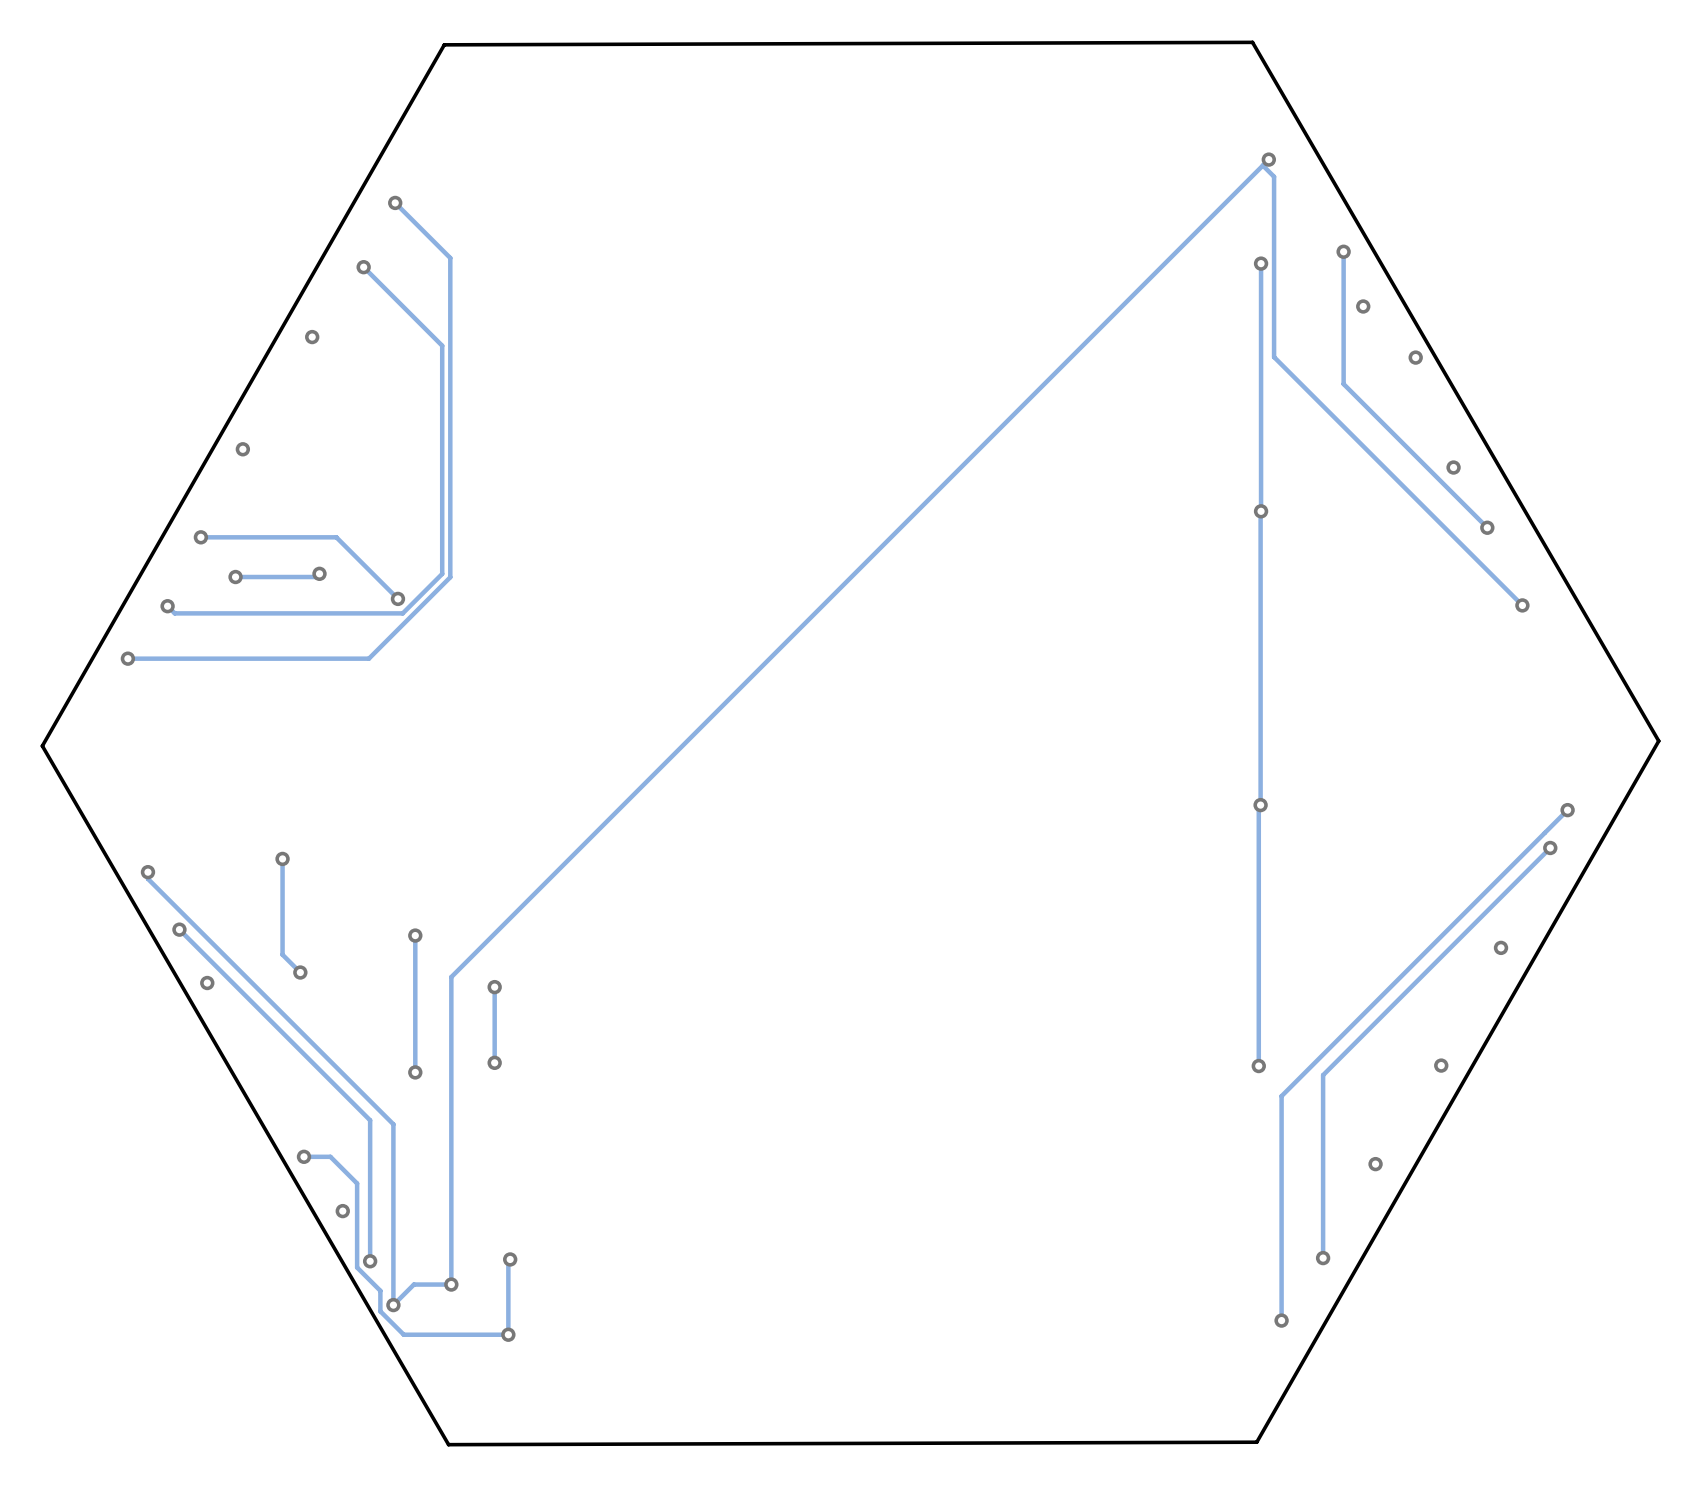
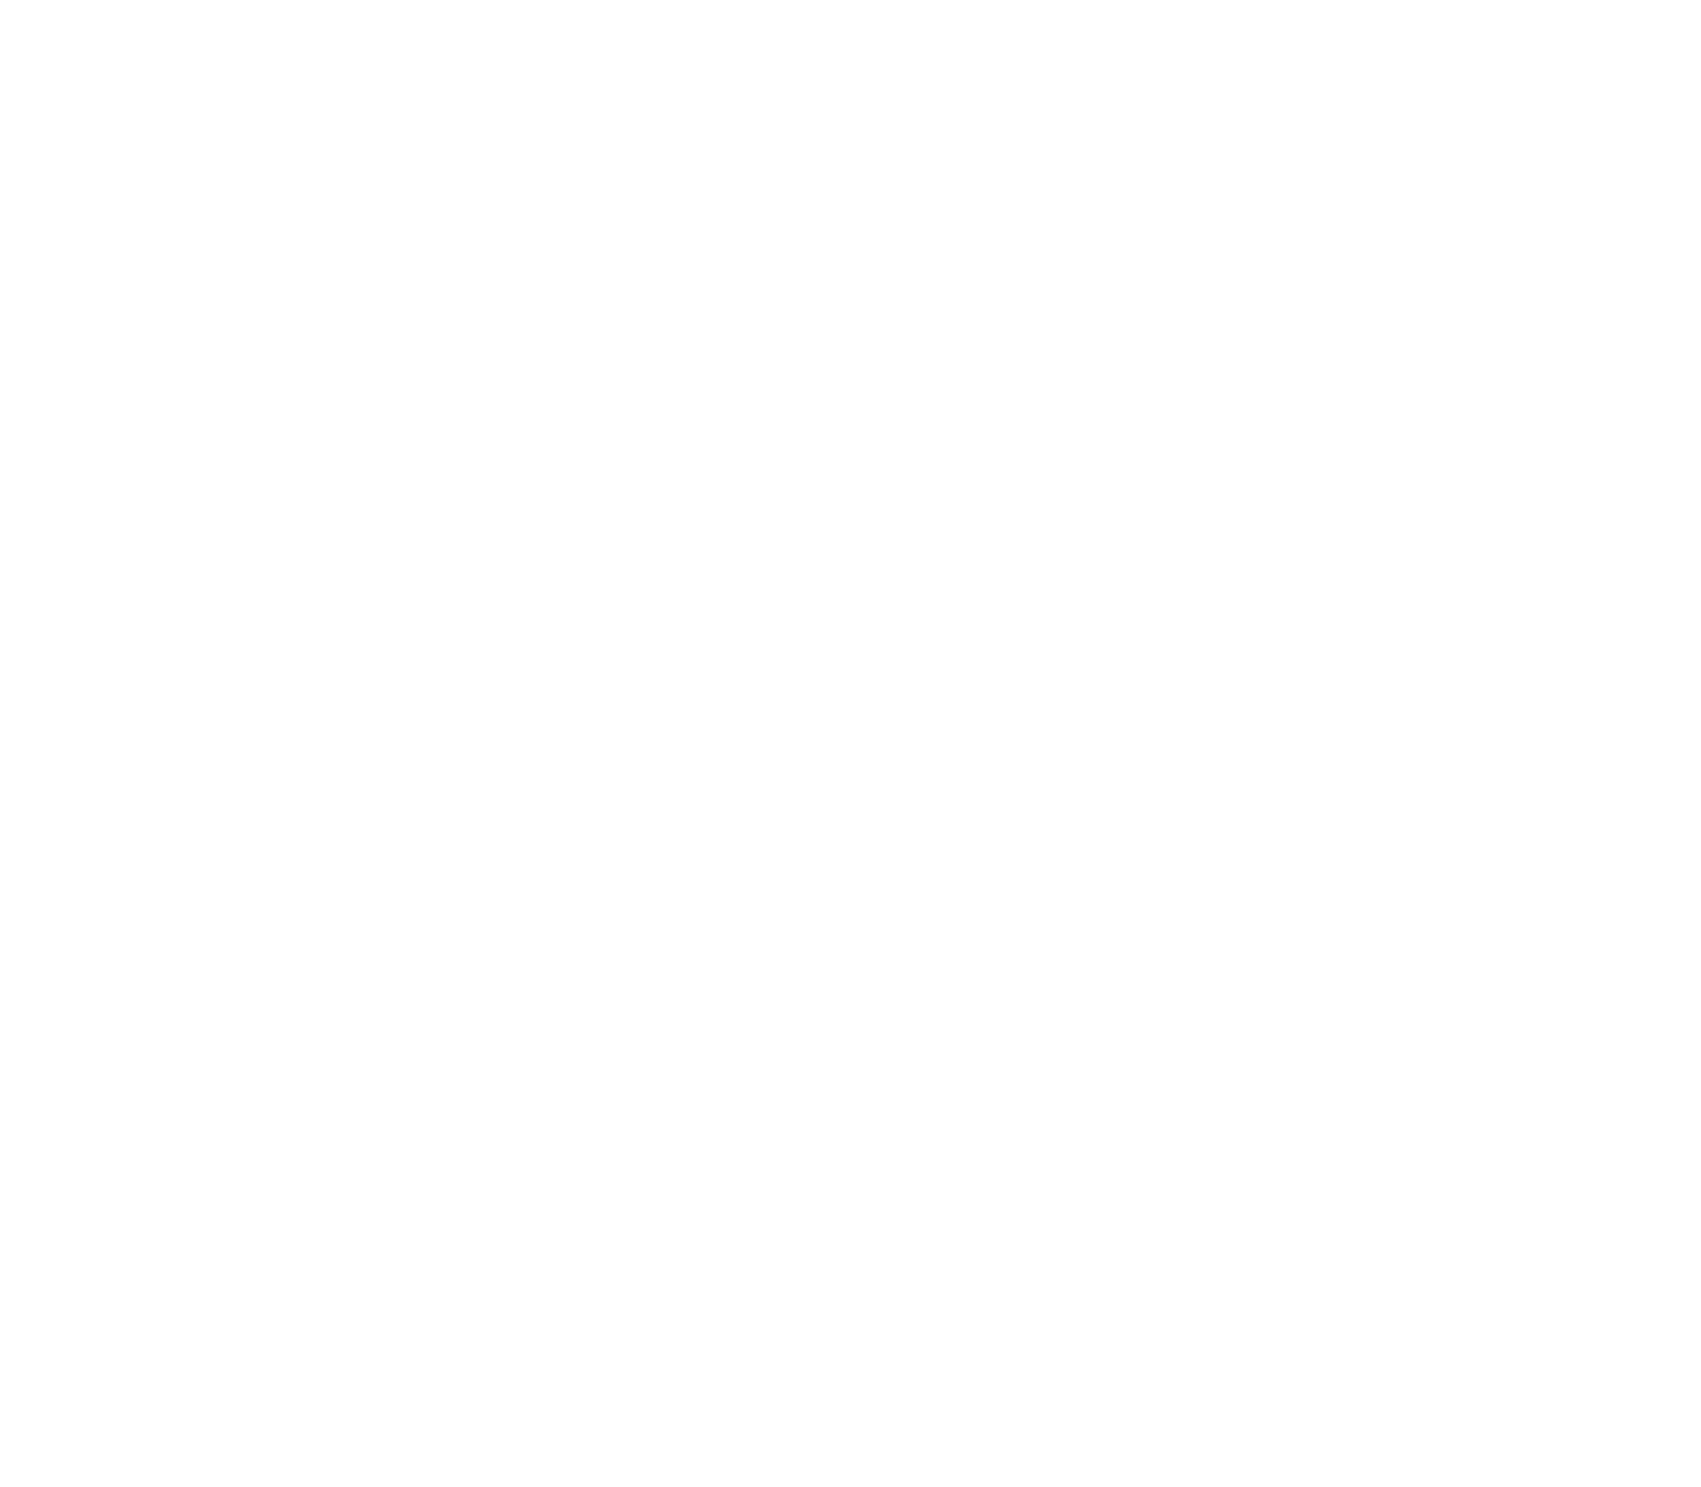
board edge: (1252, 42) (444, 44) (42, 745) (448, 1444) (1256, 1442) (1658, 741) (1252, 42) -> none
track: (1268, 159) (451, 977) (451, 1284) (413, 1284) (393, 1305) (393, 1124) (147, 878) (147, 872) -> none
via: (1268, 159) -> none
track: (1262, 165) (1274, 176) (1274, 357) (1522, 605) -> none
track: (395, 202) (450, 258) (450, 577) (368, 658) (127, 658) -> none
via: (395, 202) -> none
track: (1343, 251) (1343, 384) (1487, 527) -> none
via: (1343, 251) -> none
track: (1261, 263) (1258, 1066) -> none
via: (1261, 263) -> none
track: (363, 267) (442, 345) (442, 573) (402, 613) (174, 613) (167, 606) -> none
via: (363, 267) -> none
via: (1363, 306) -> none
via: (312, 337) -> none
via: (1415, 357) -> none
via: (242, 449) -> none
via: (1453, 467) -> none
via: (1261, 511) -> none
via: (1487, 527) -> none
track: (200, 537) (336, 537) (397, 598) -> none
via: (200, 537) -> none
track: (319, 573) (316, 577) (235, 577) -> none
via: (319, 573) -> none
via: (235, 577) -> none
via: (397, 598) -> none
via: (1522, 605) -> none
via: (167, 606) -> none
via: (127, 658) -> none
via: (1260, 805) -> none
track: (1567, 810) (1281, 1096) (1281, 1320) -> none
via: (1567, 810) -> none
track: (1550, 847) (1323, 1075) (1323, 1258) -> none
via: (1550, 847) -> none
track: (282, 858) (282, 954) (300, 972) -> none
via: (282, 858) -> none
via: (147, 872) -> none
track: (179, 929) (370, 1120) (370, 1261) -> none
via: (179, 929) -> none
track: (415, 935) (415, 1072) -> none
via: (415, 935) -> none
via: (1501, 947) -> none
via: (300, 972) -> none
via: (207, 983) -> none
track: (494, 987) (494, 1062) -> none
via: (494, 987) -> none
via: (494, 1062) -> none
via: (1441, 1065) -> none
via: (1258, 1066) -> none
via: (415, 1072) -> none
track: (303, 1156) (330, 1156) (357, 1183) (357, 1267) (380, 1290) (380, 1311) (403, 1334) (508, 1334) (508, 1261) (510, 1259) -> none
via: (303, 1156) -> none
via: (1375, 1164) -> none
via: (342, 1211) -> none
via: (1323, 1258) -> none
via: (510, 1259) -> none
via: (370, 1261) -> none
via: (451, 1284) -> none
via: (393, 1305) -> none
via: (1281, 1320) -> none
via: (508, 1334) -> none

